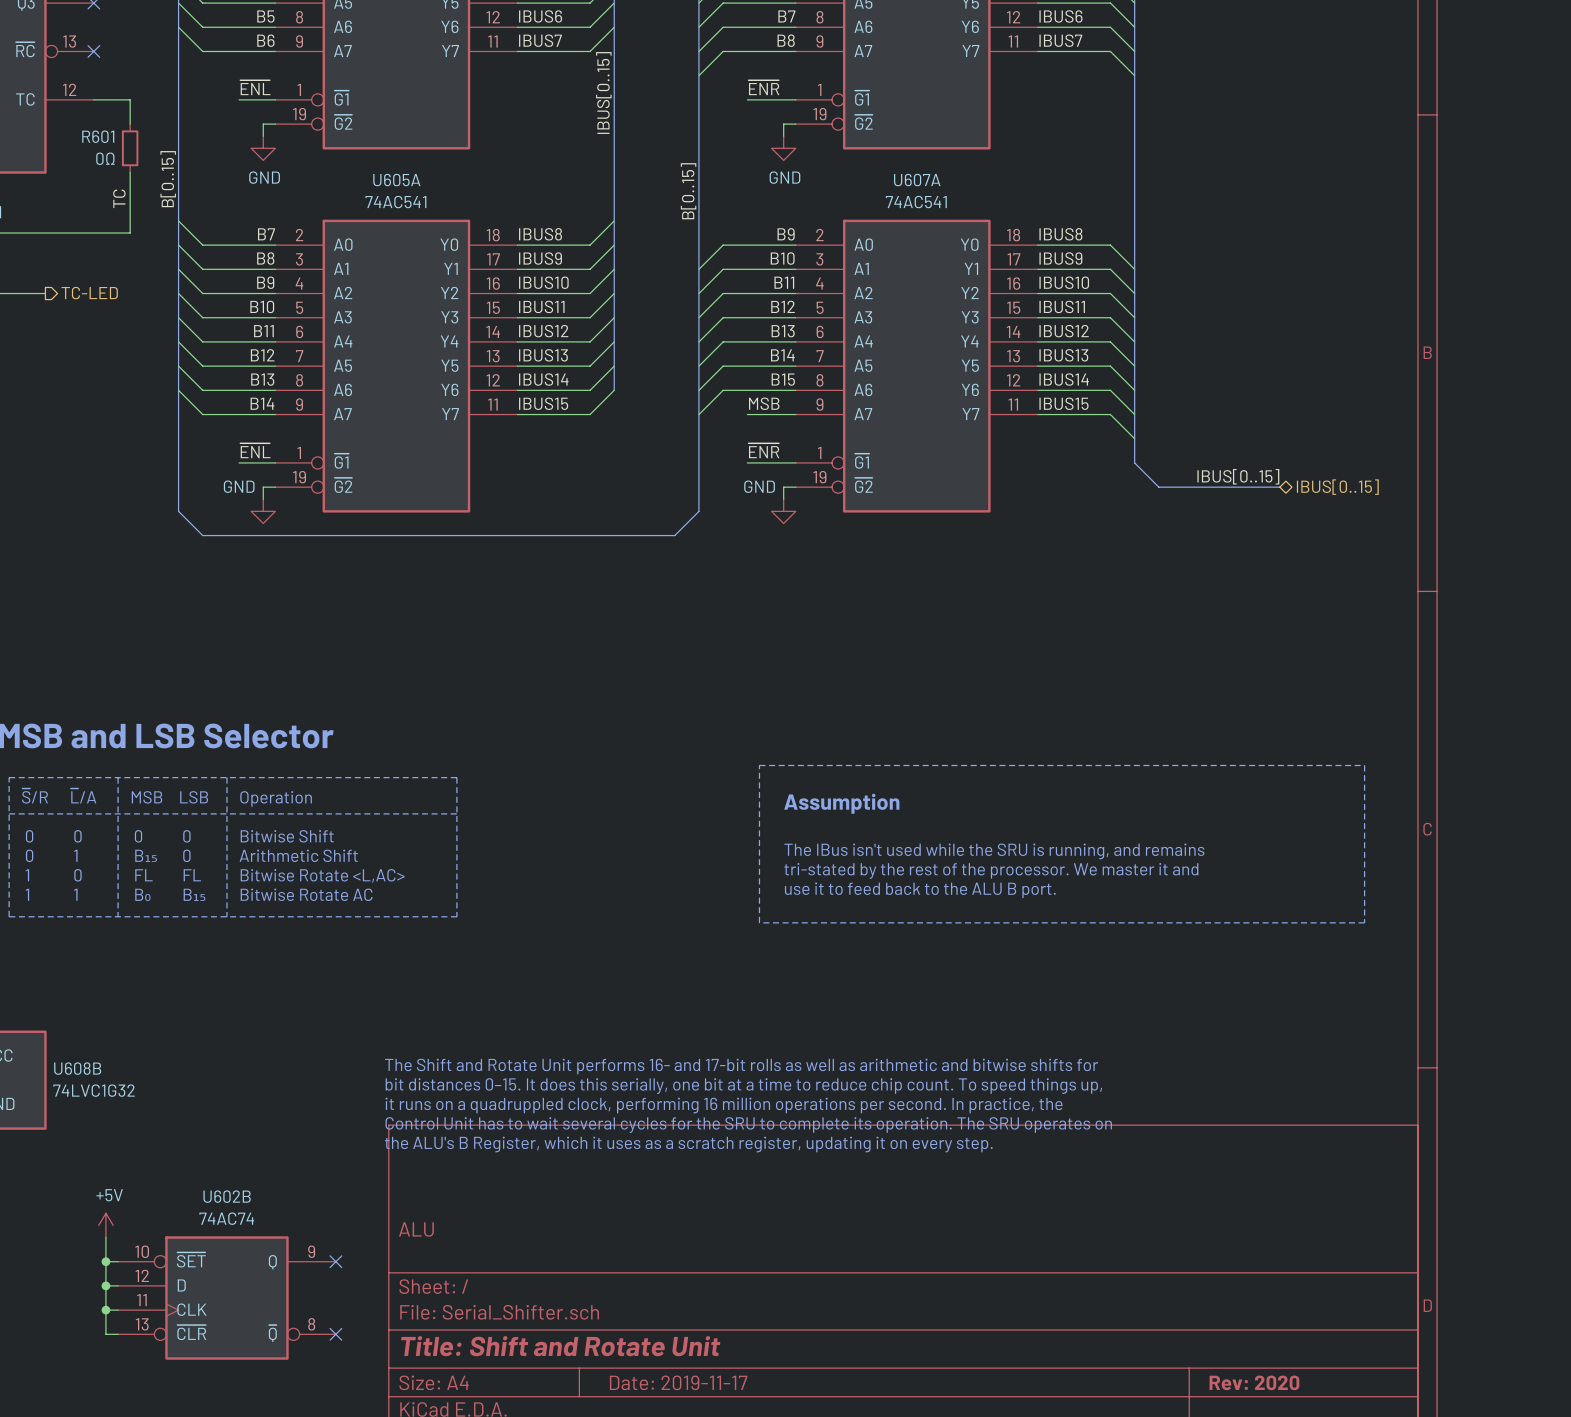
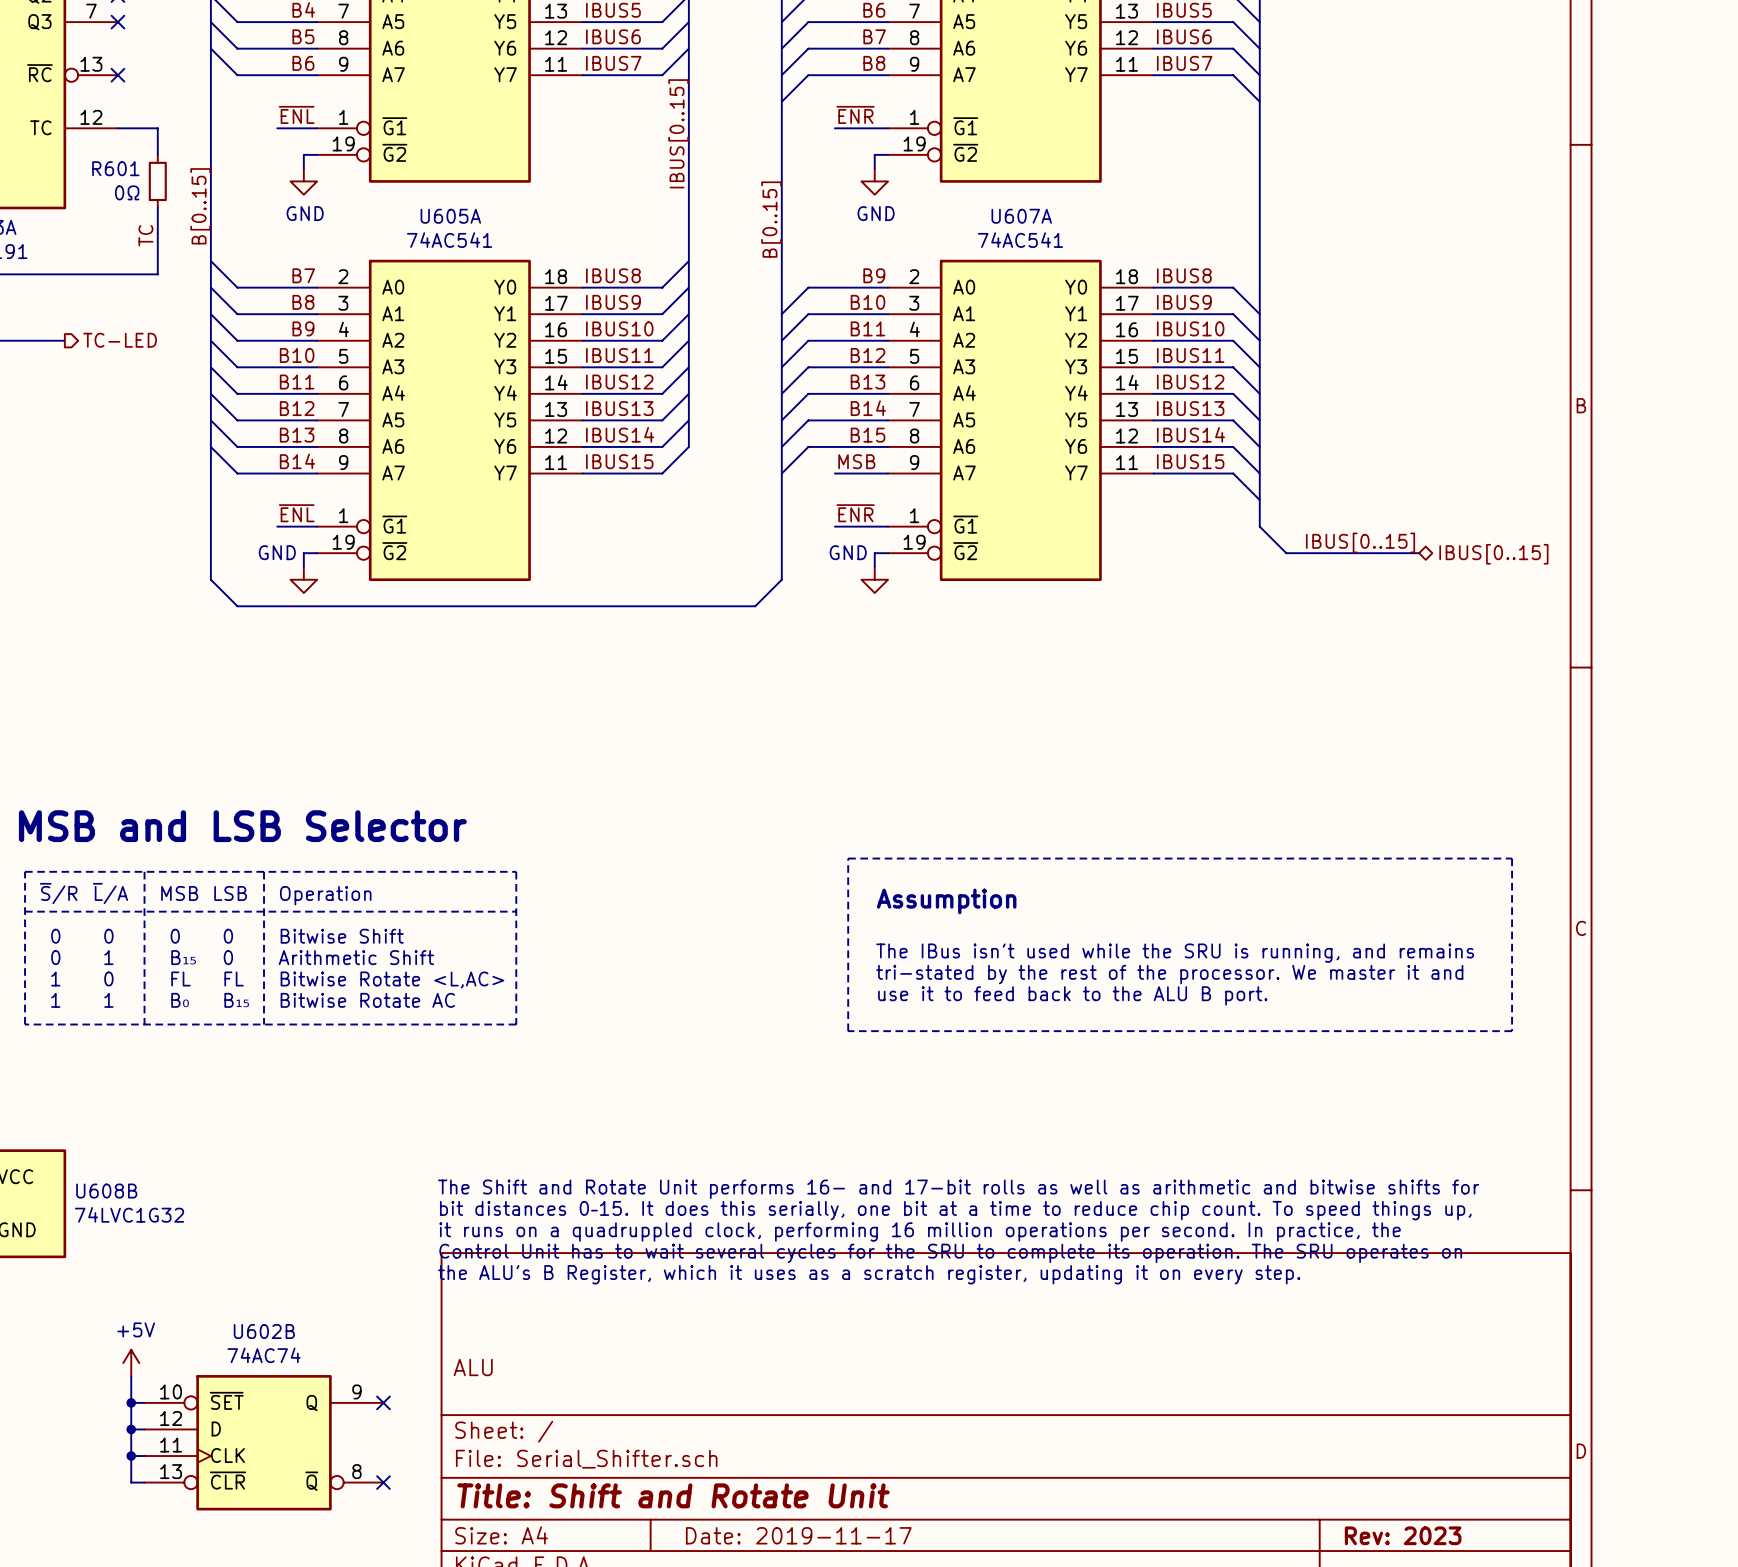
title block: Rev: 2020 (1254, 1382) -> Rev: 2023 (1403, 1535)

